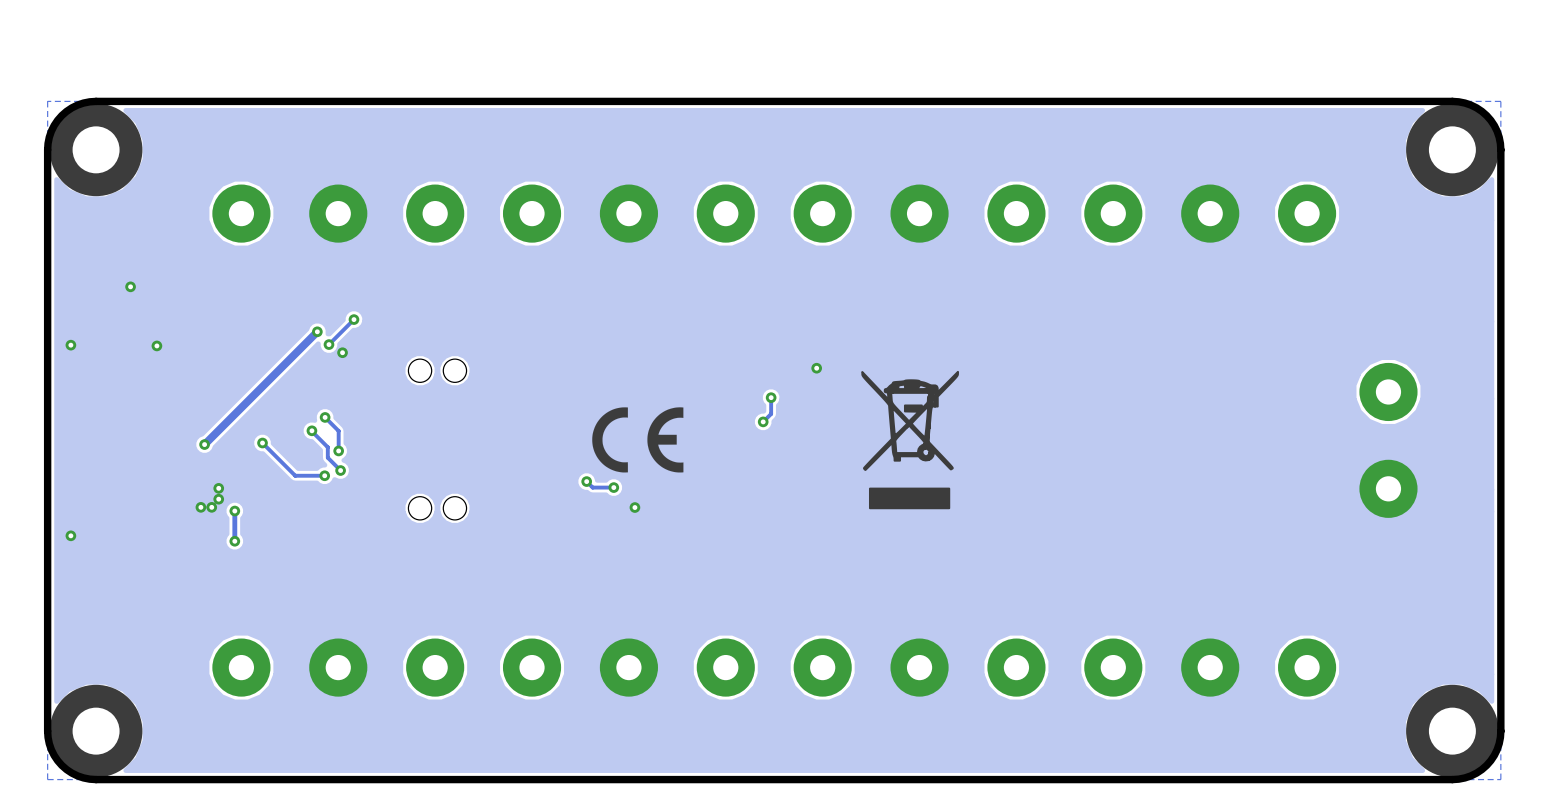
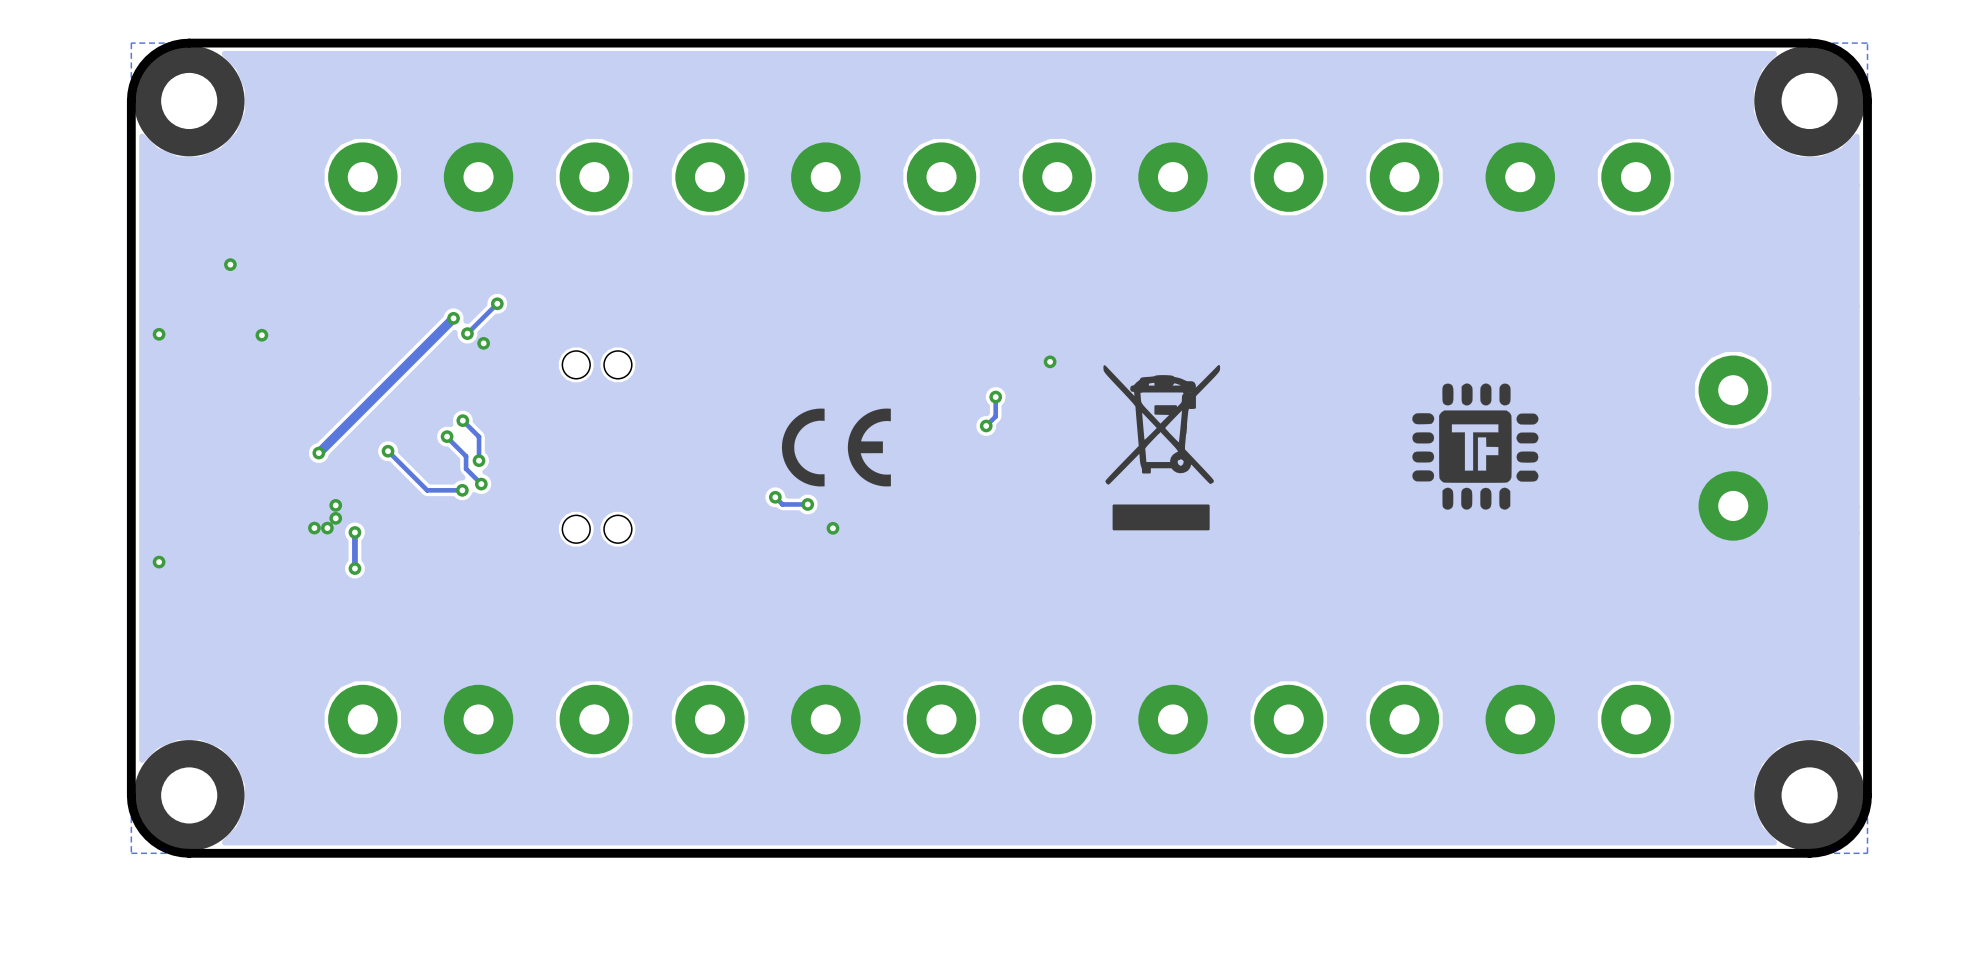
drawing: none -> [1412, 383, 1539, 510]

